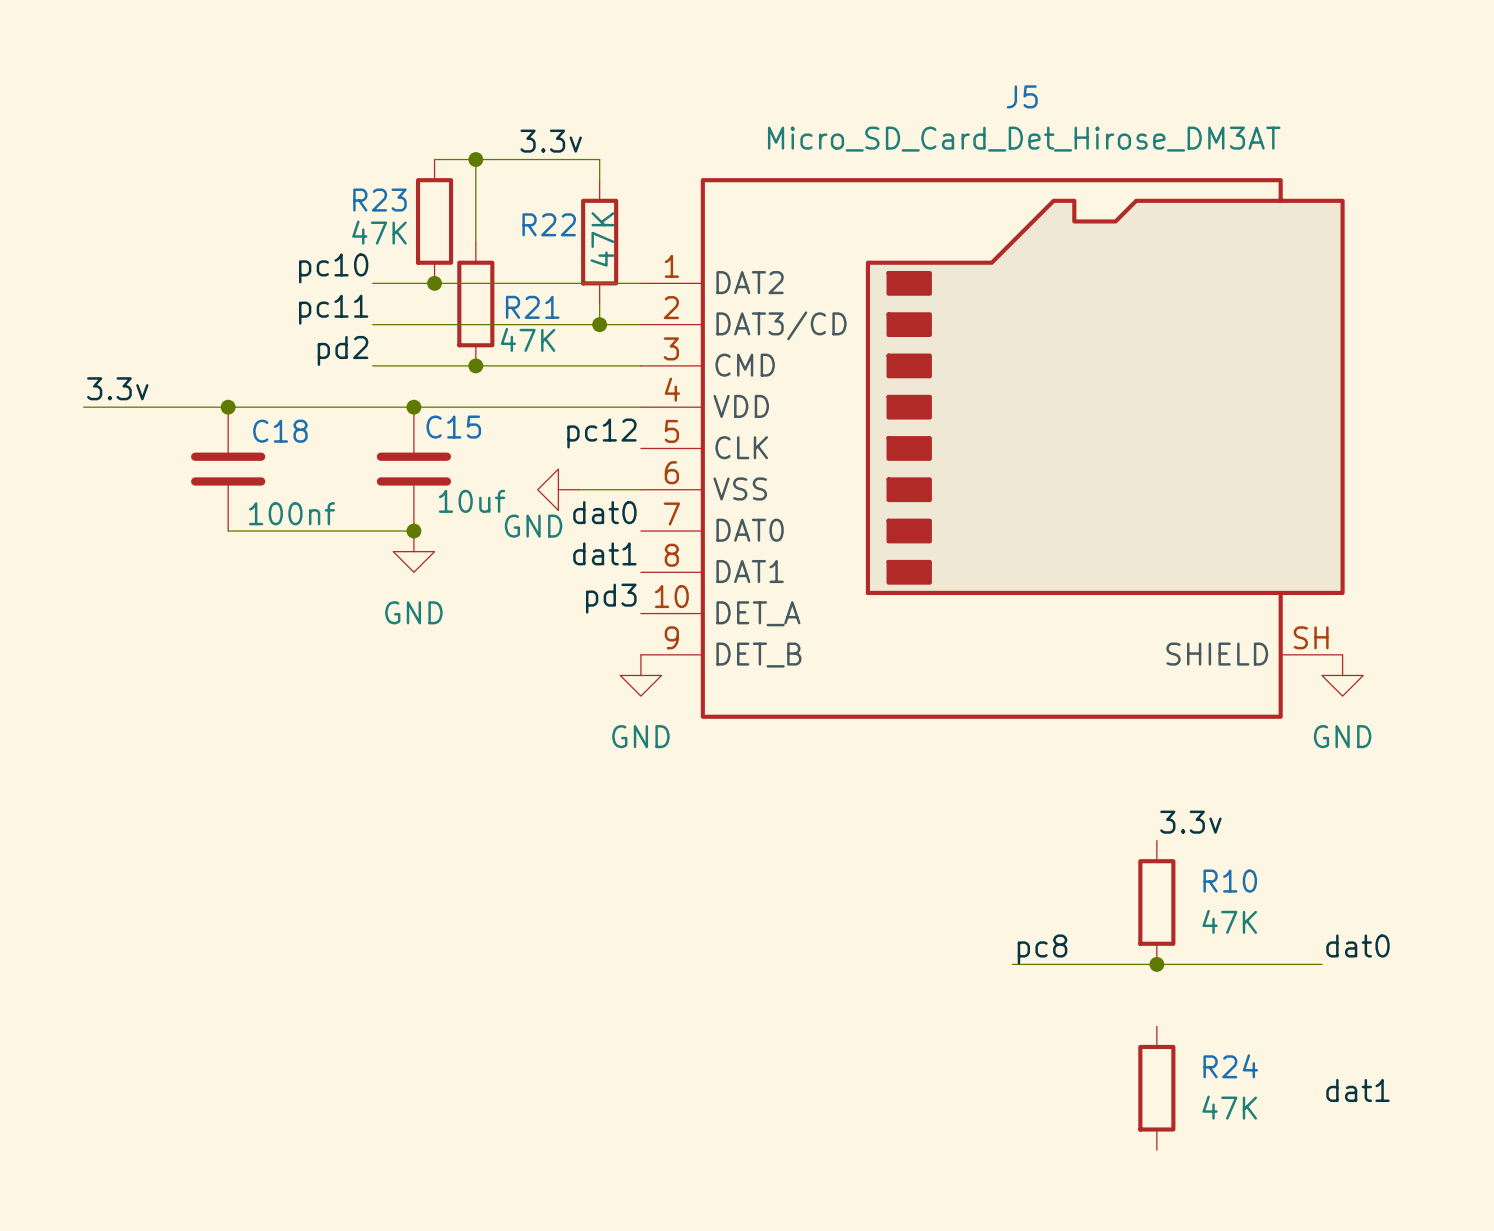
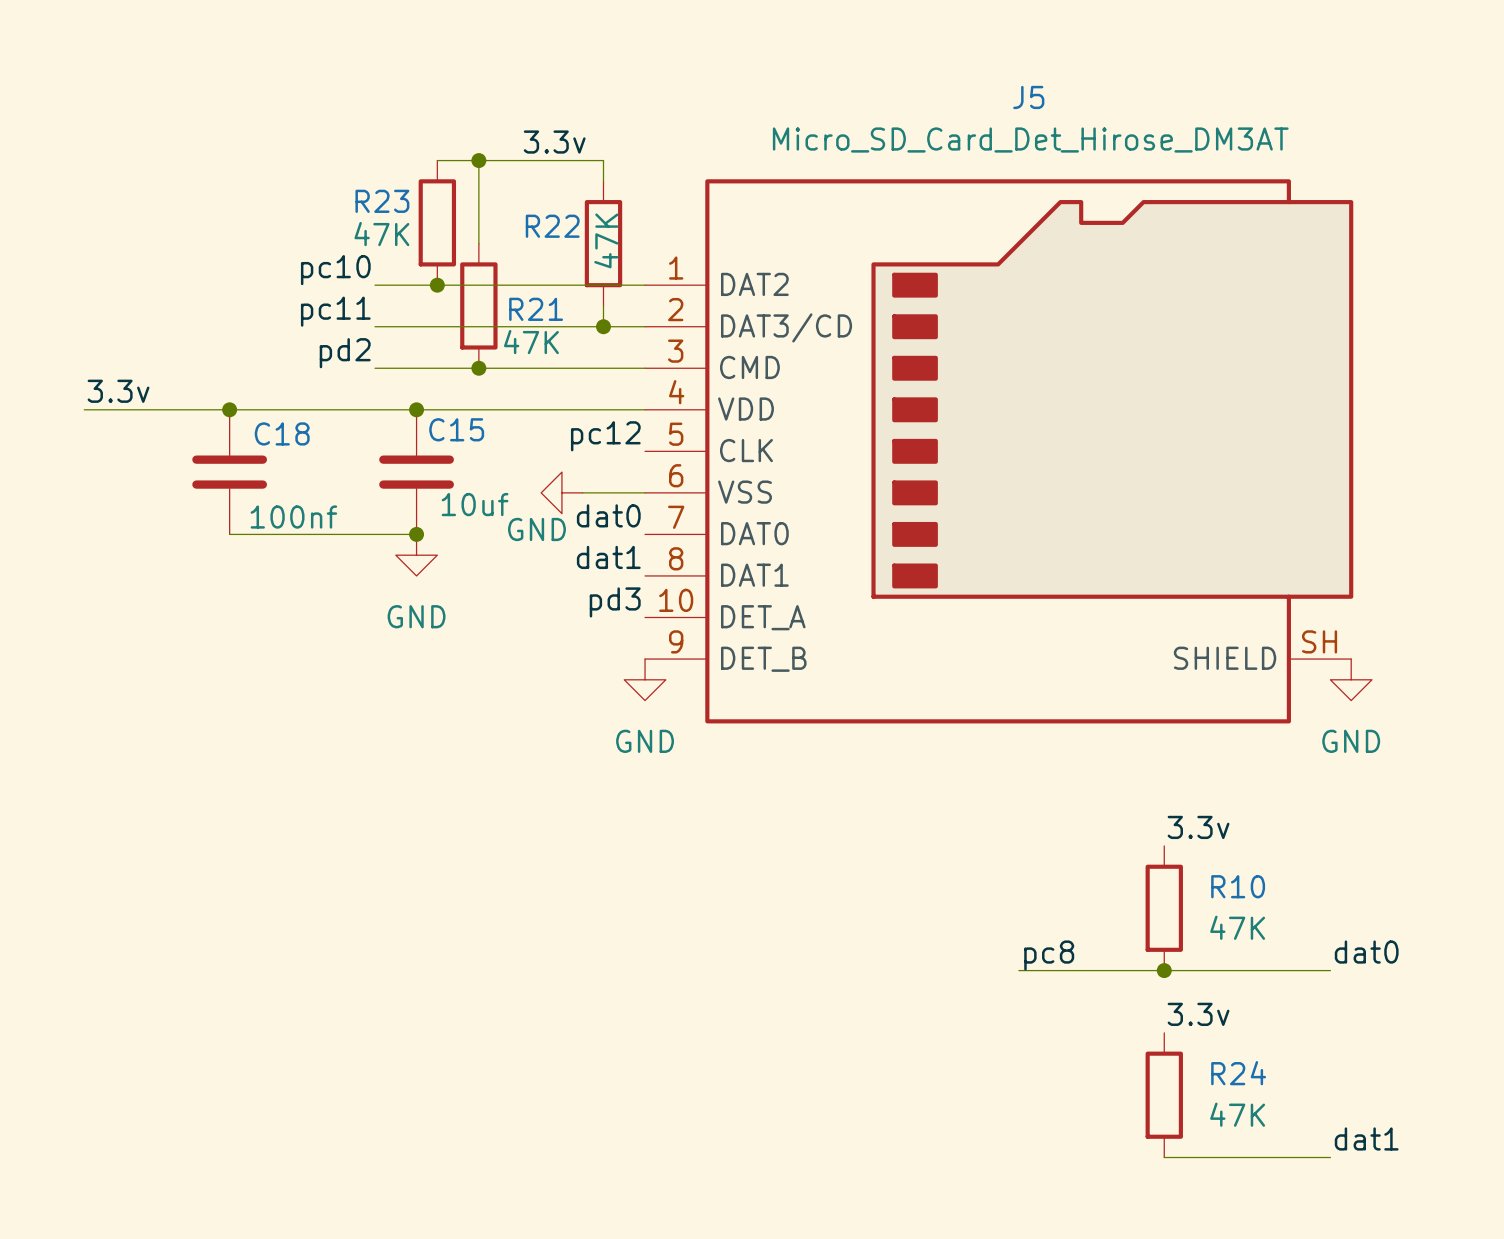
label: none -> 3.3v (1198, 1014)
label position: dat1 (1357, 1090) -> dat1 (1366, 1138)
wire: none -> (1164, 1157) (1330, 1157)

